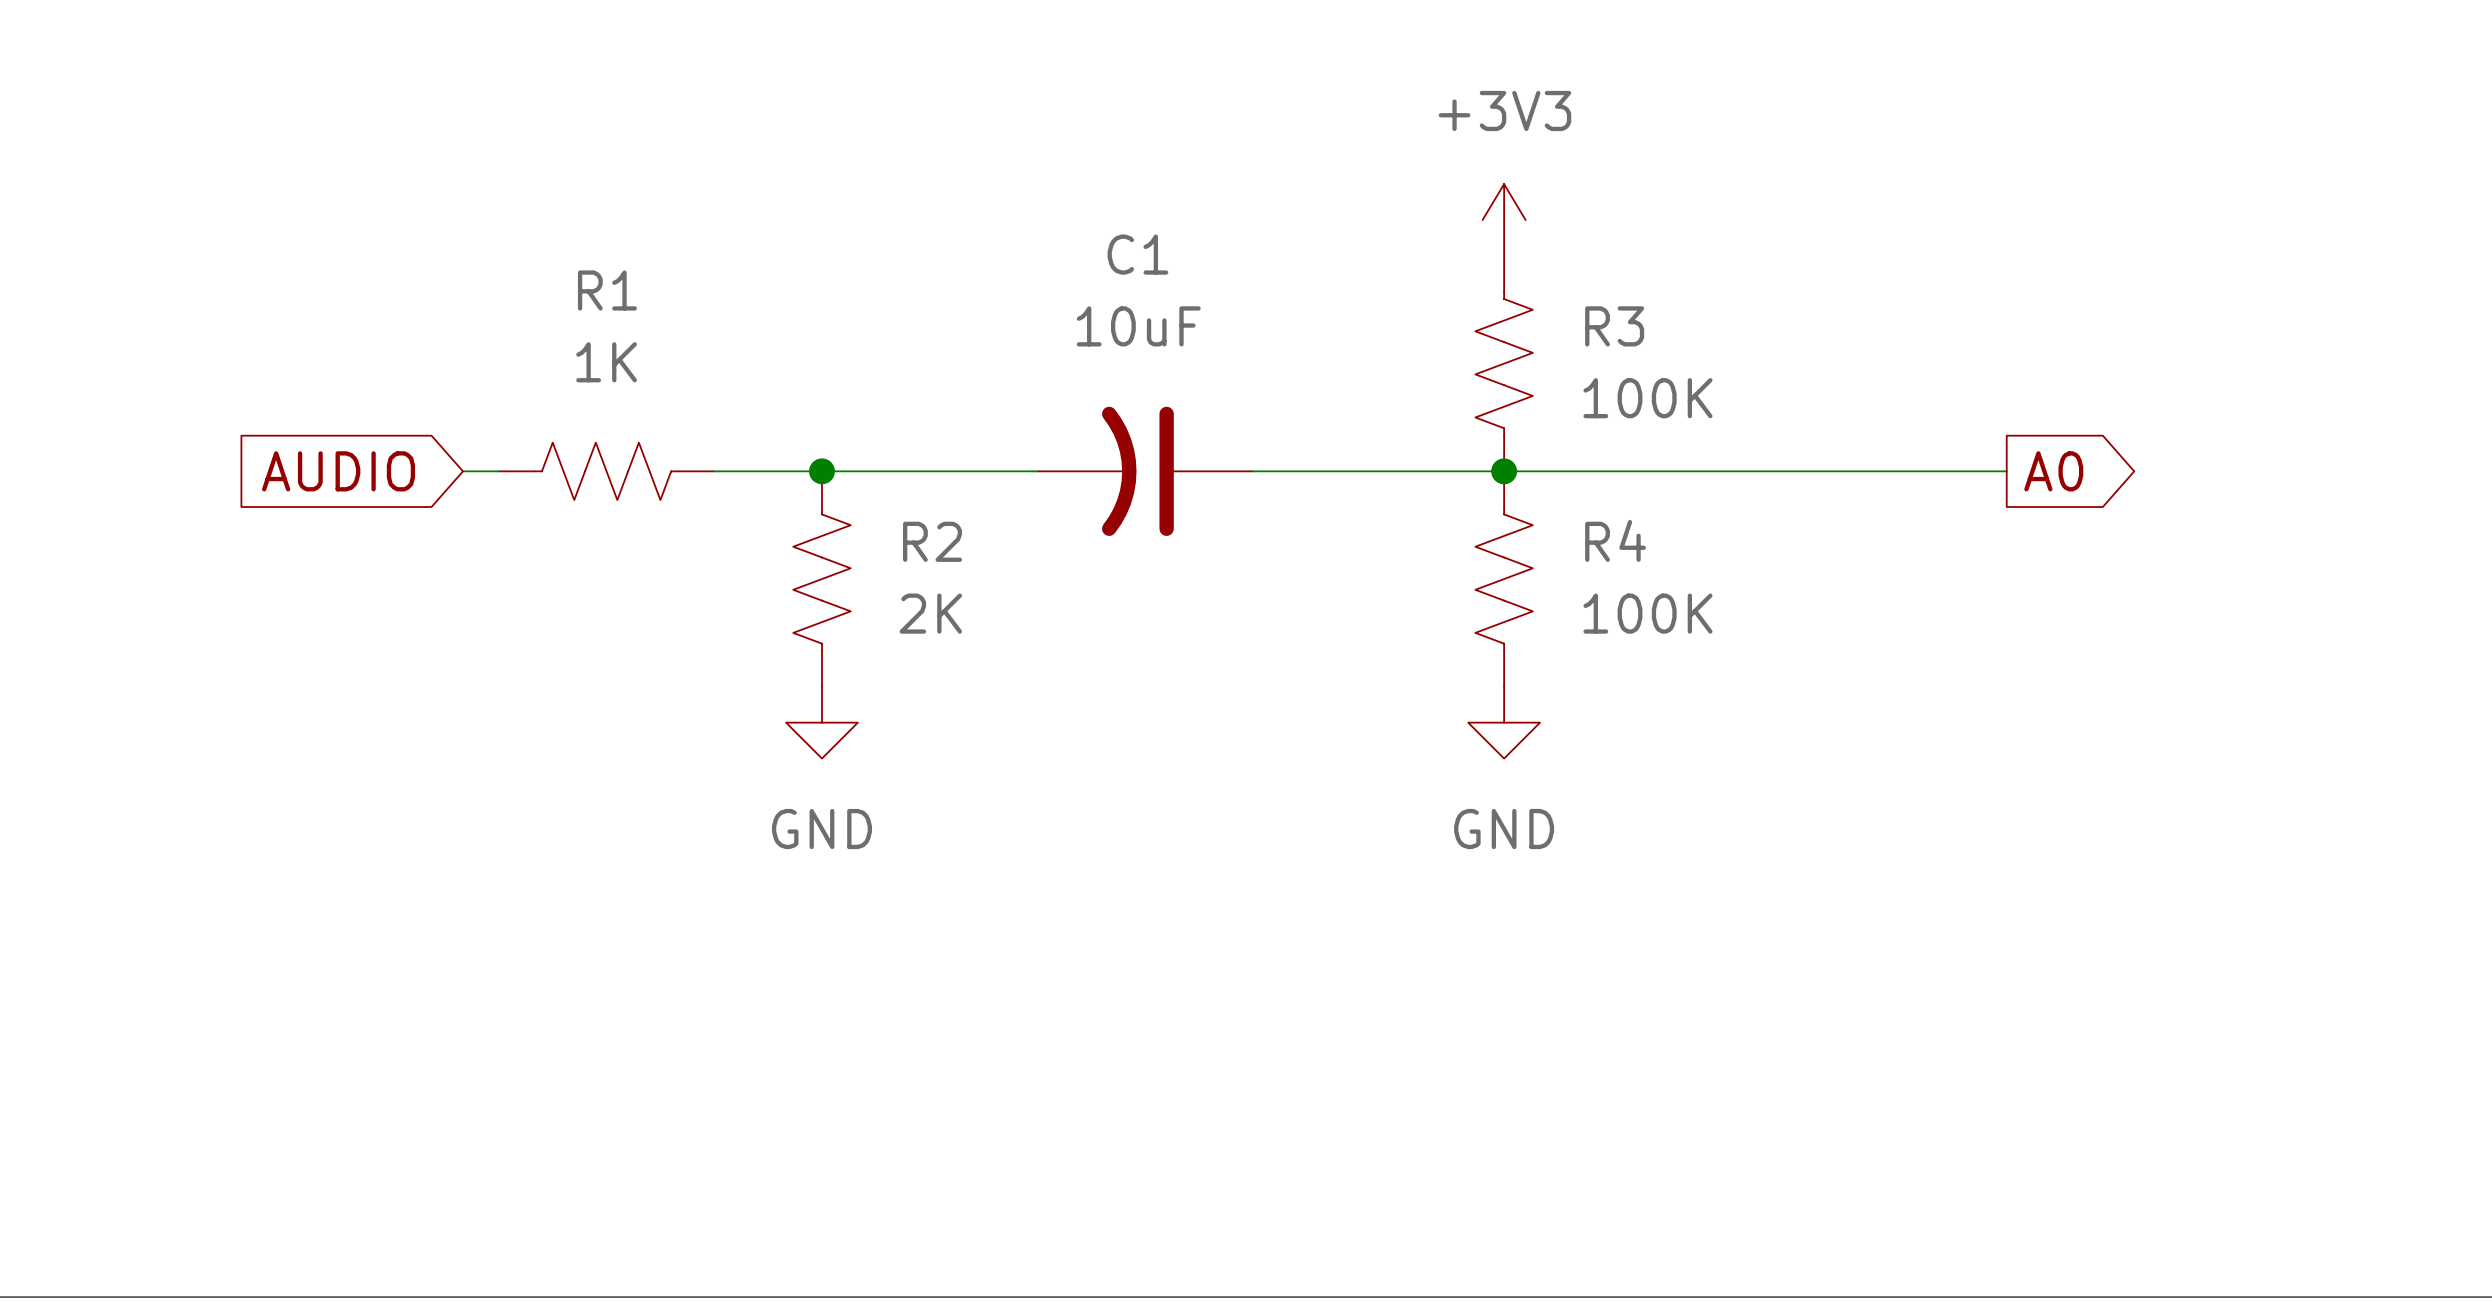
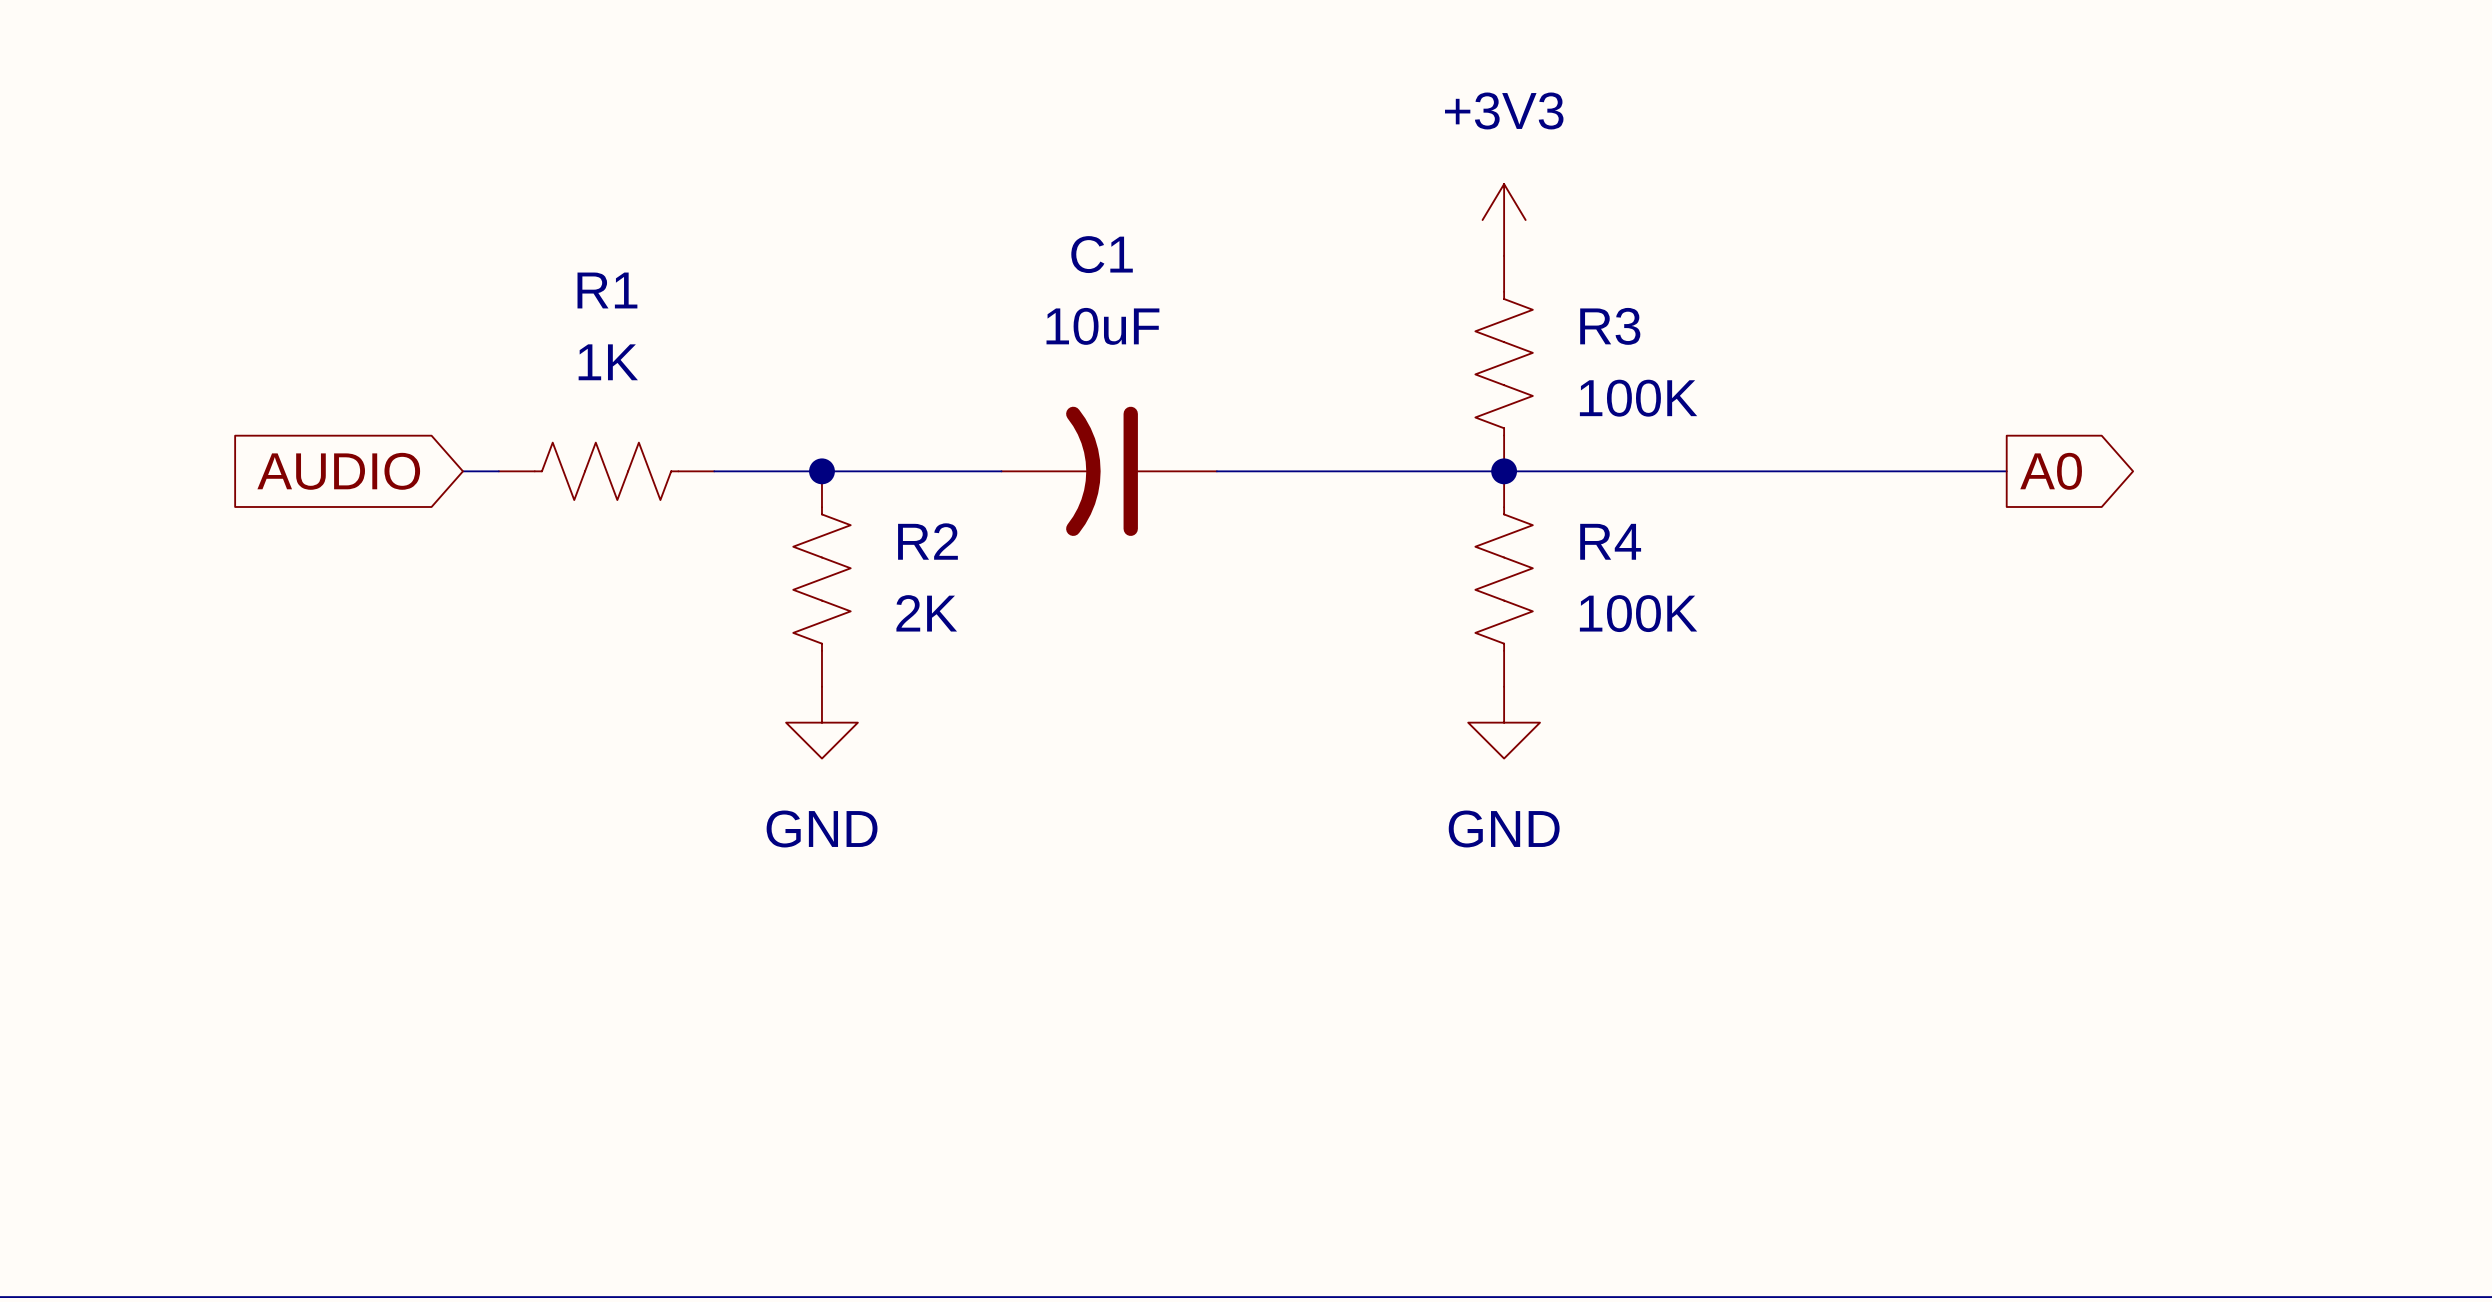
C1 position: (1145, 471) -> (1109, 471)

